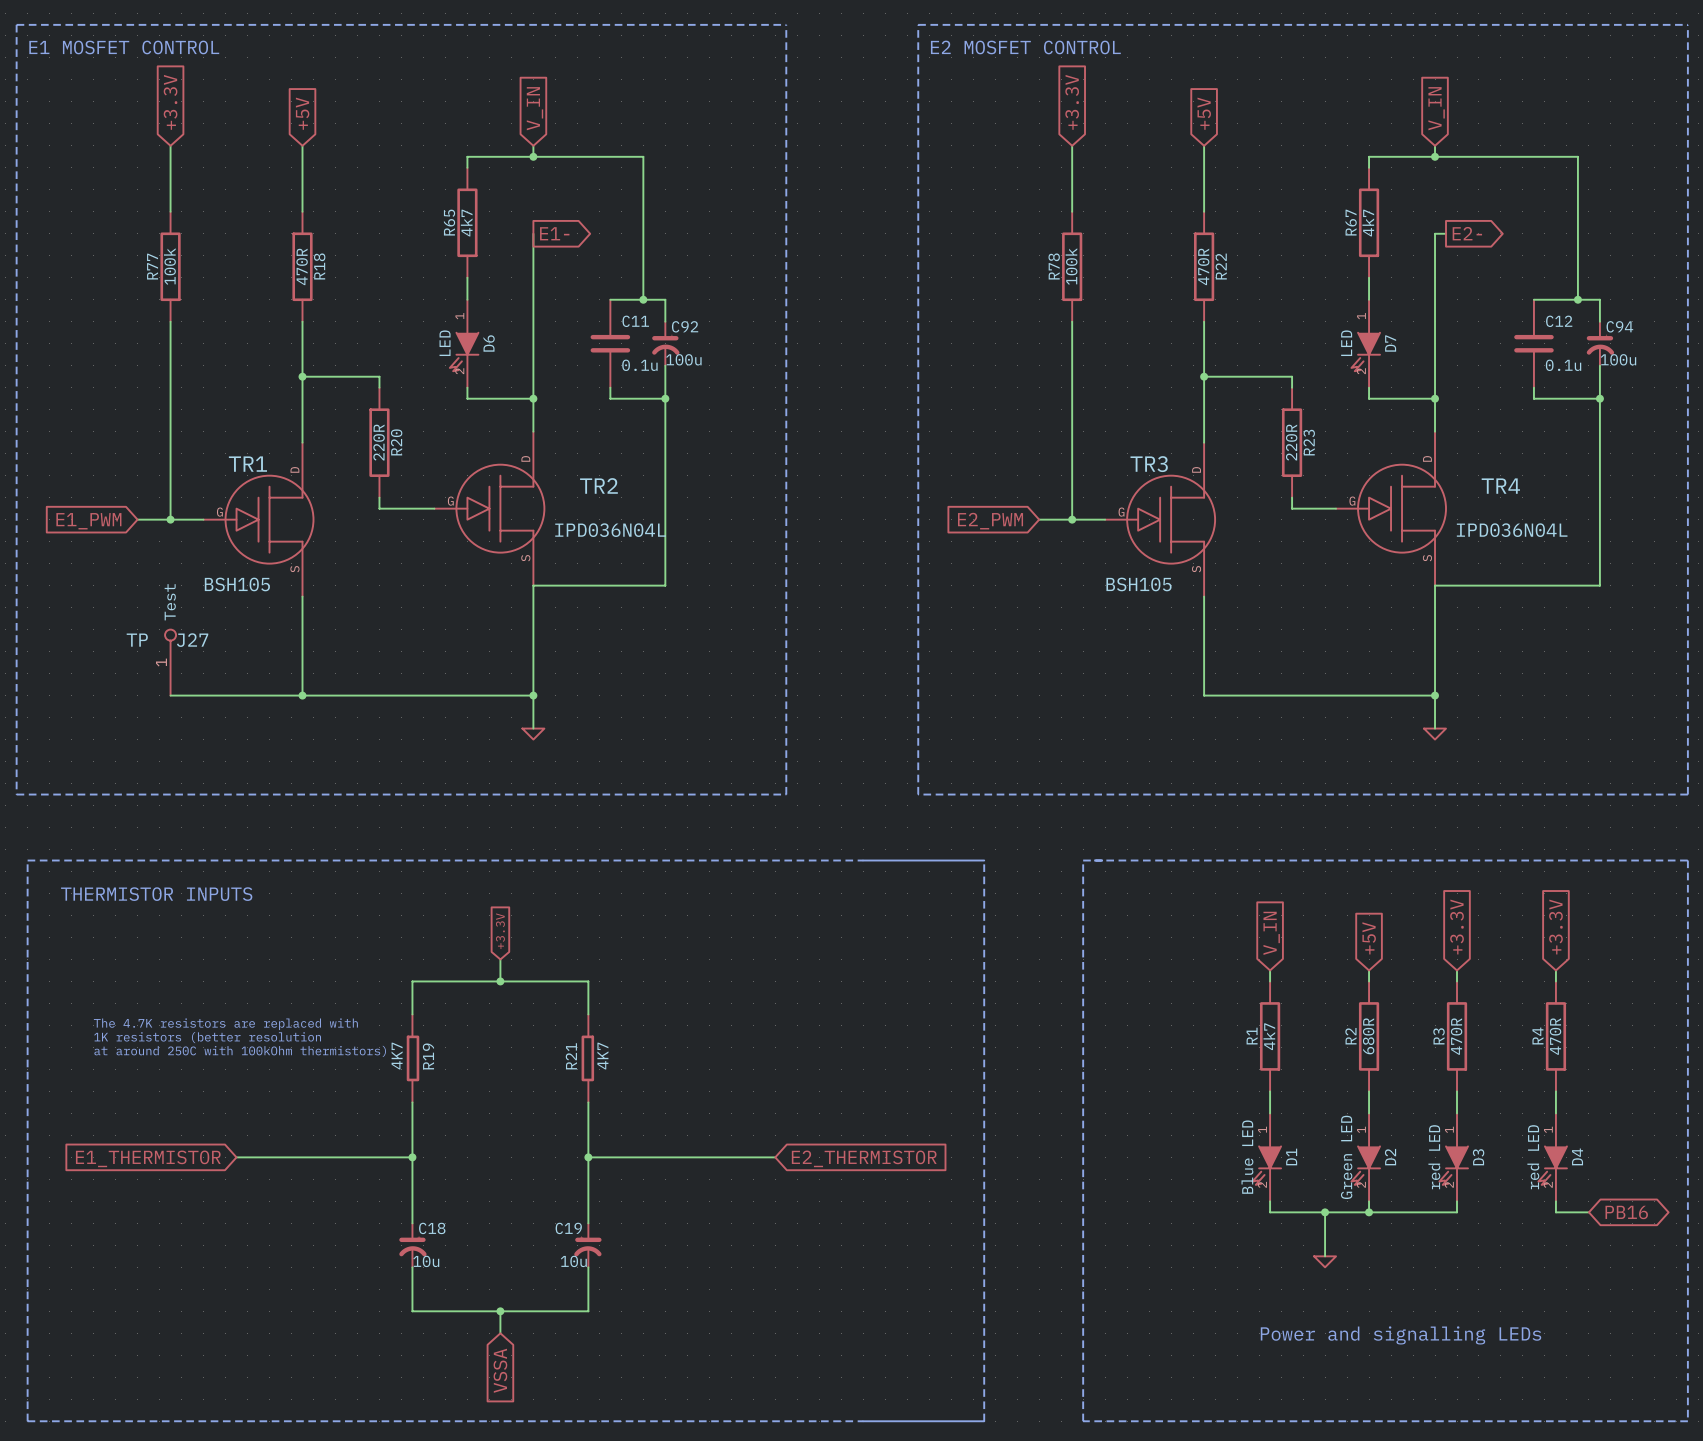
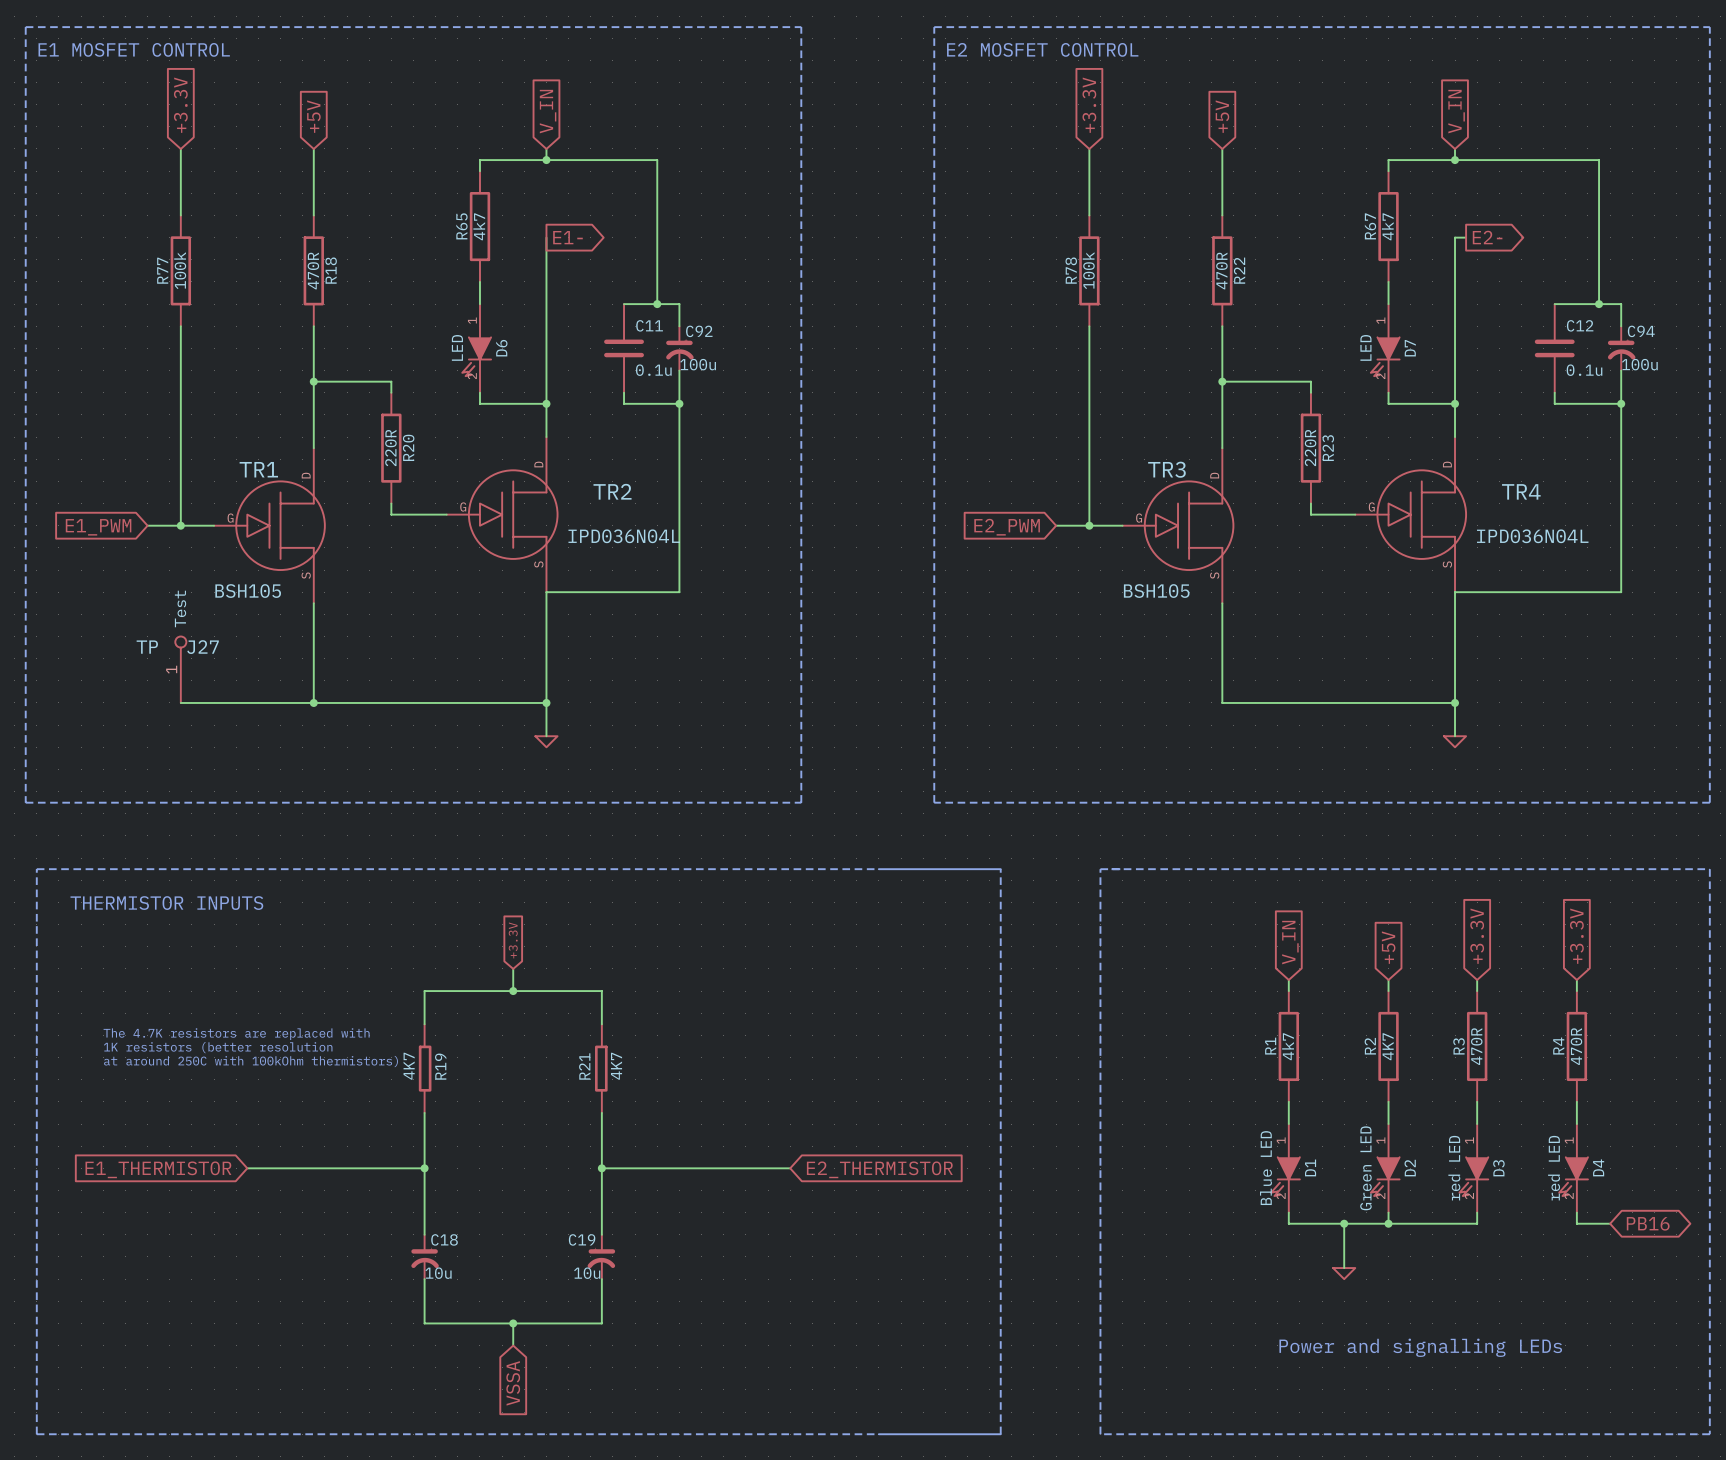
R2 value: 680R (1368, 1036) -> 4K7 (1388, 1046)

